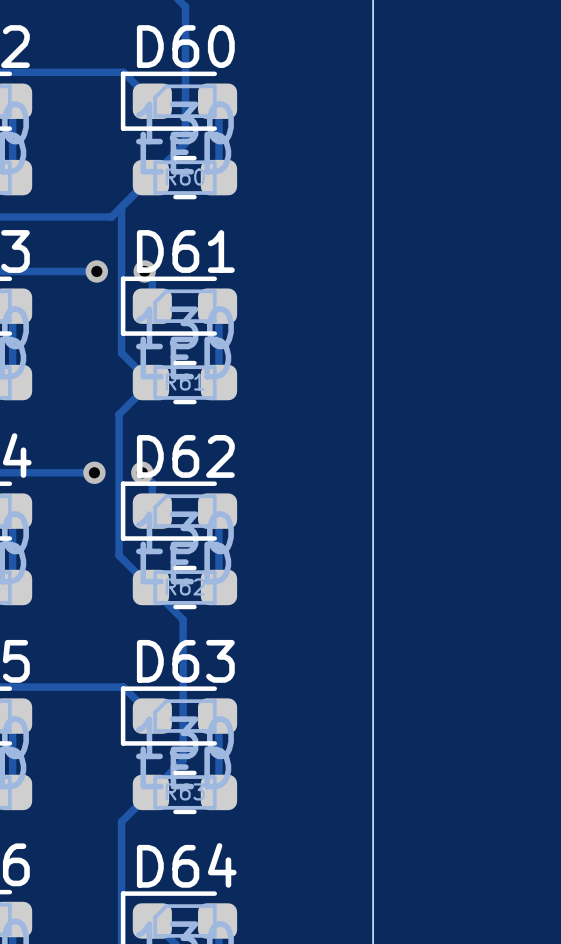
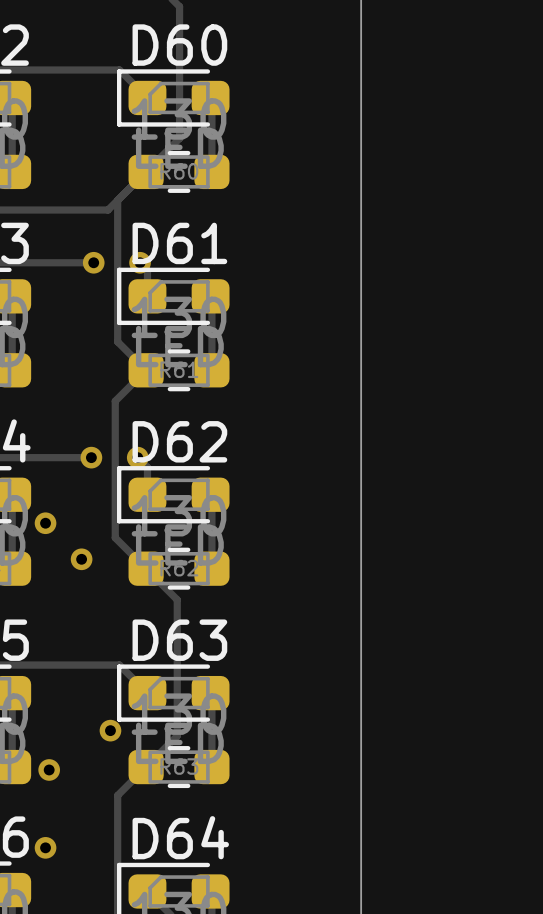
via: none -> (45, 523)
via: none -> (81, 559)
via: none -> (110, 730)
via: none -> (49, 769)
via: none -> (45, 847)

